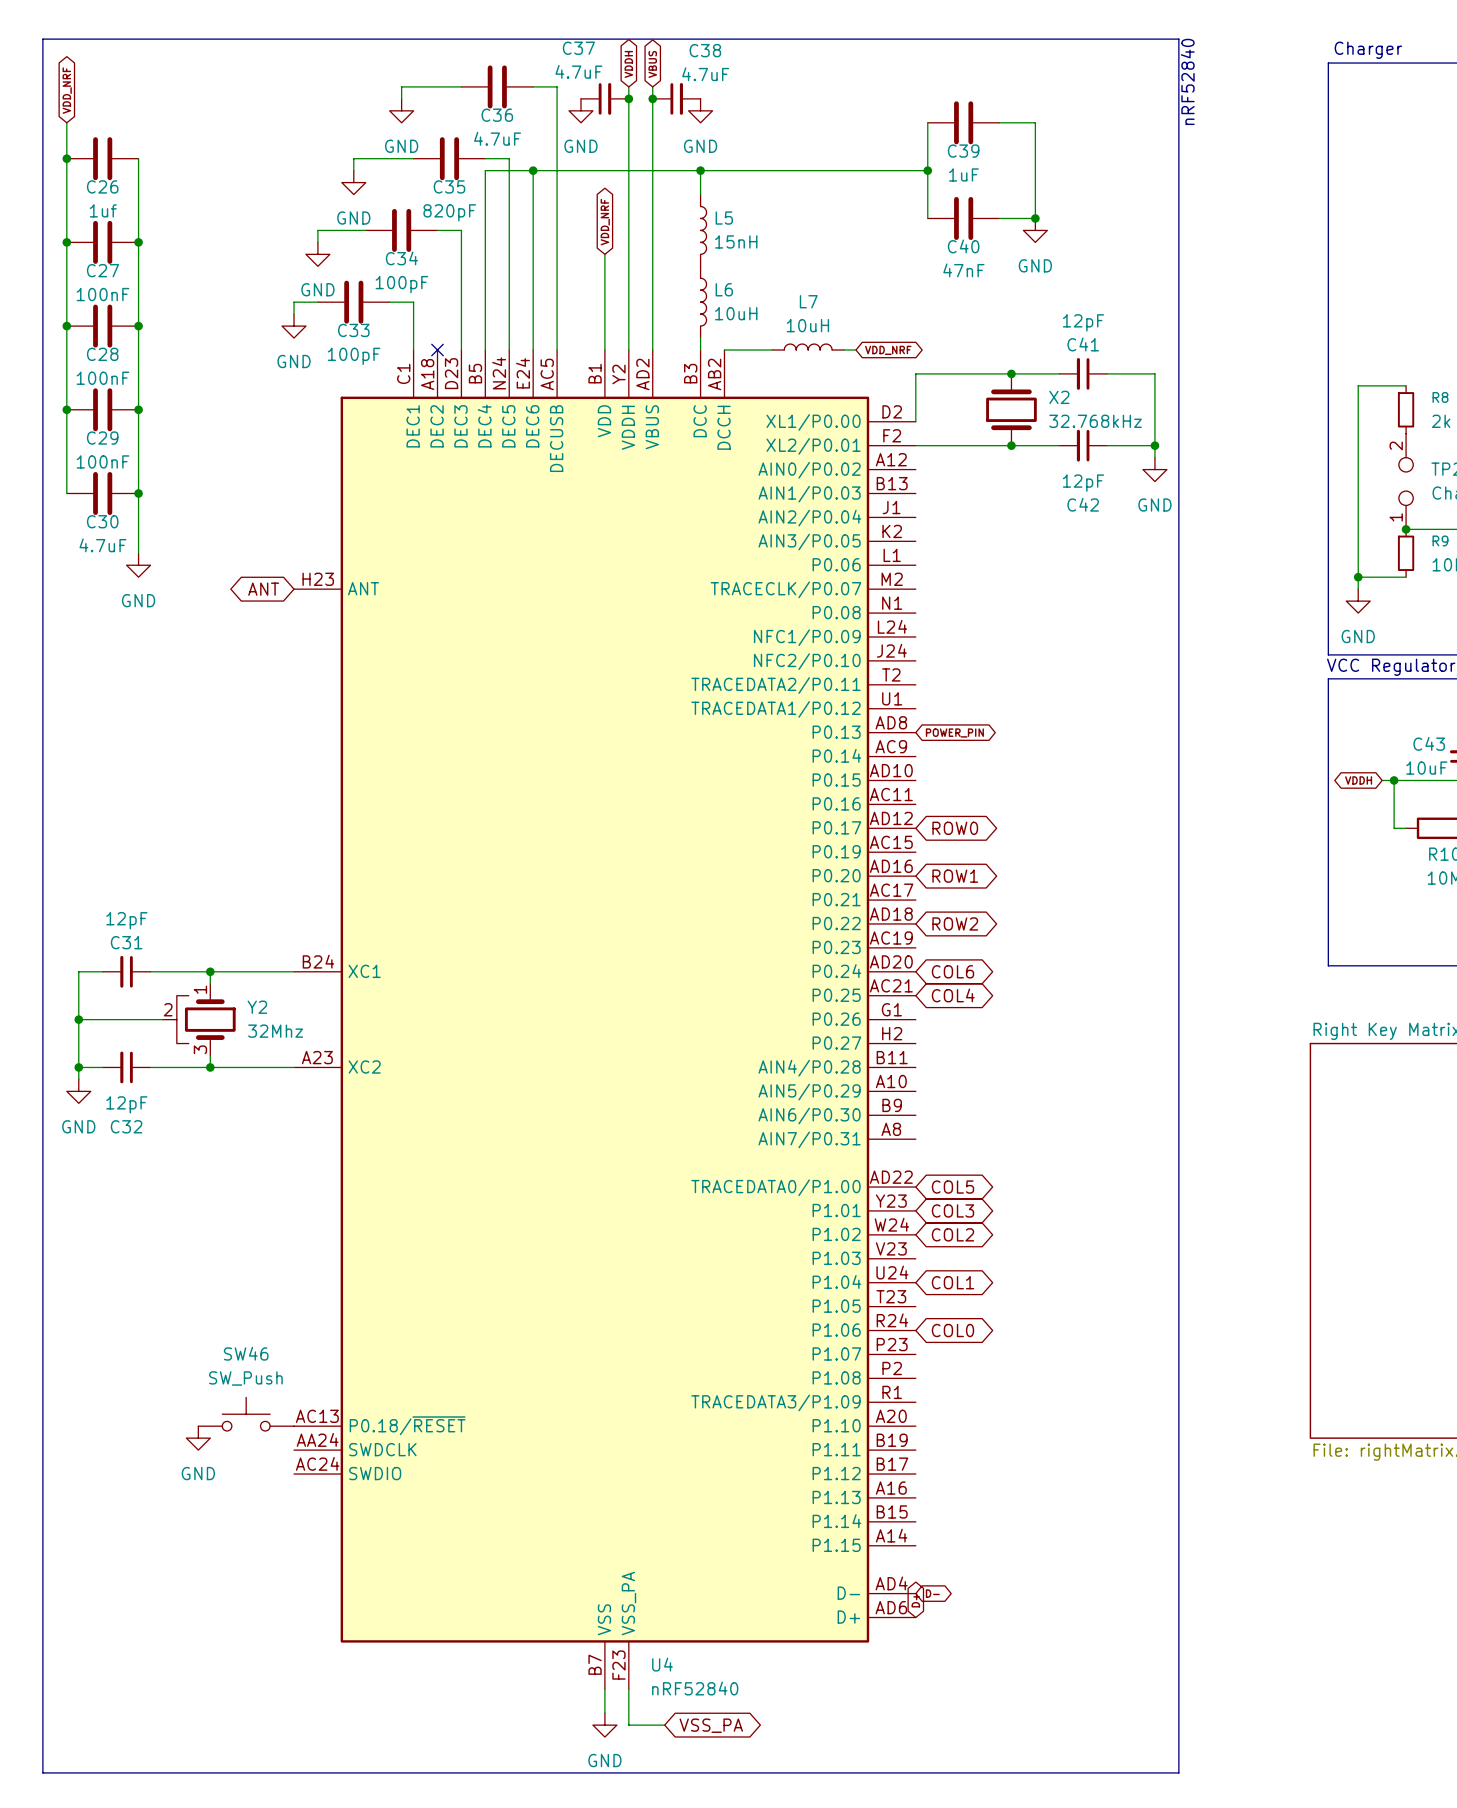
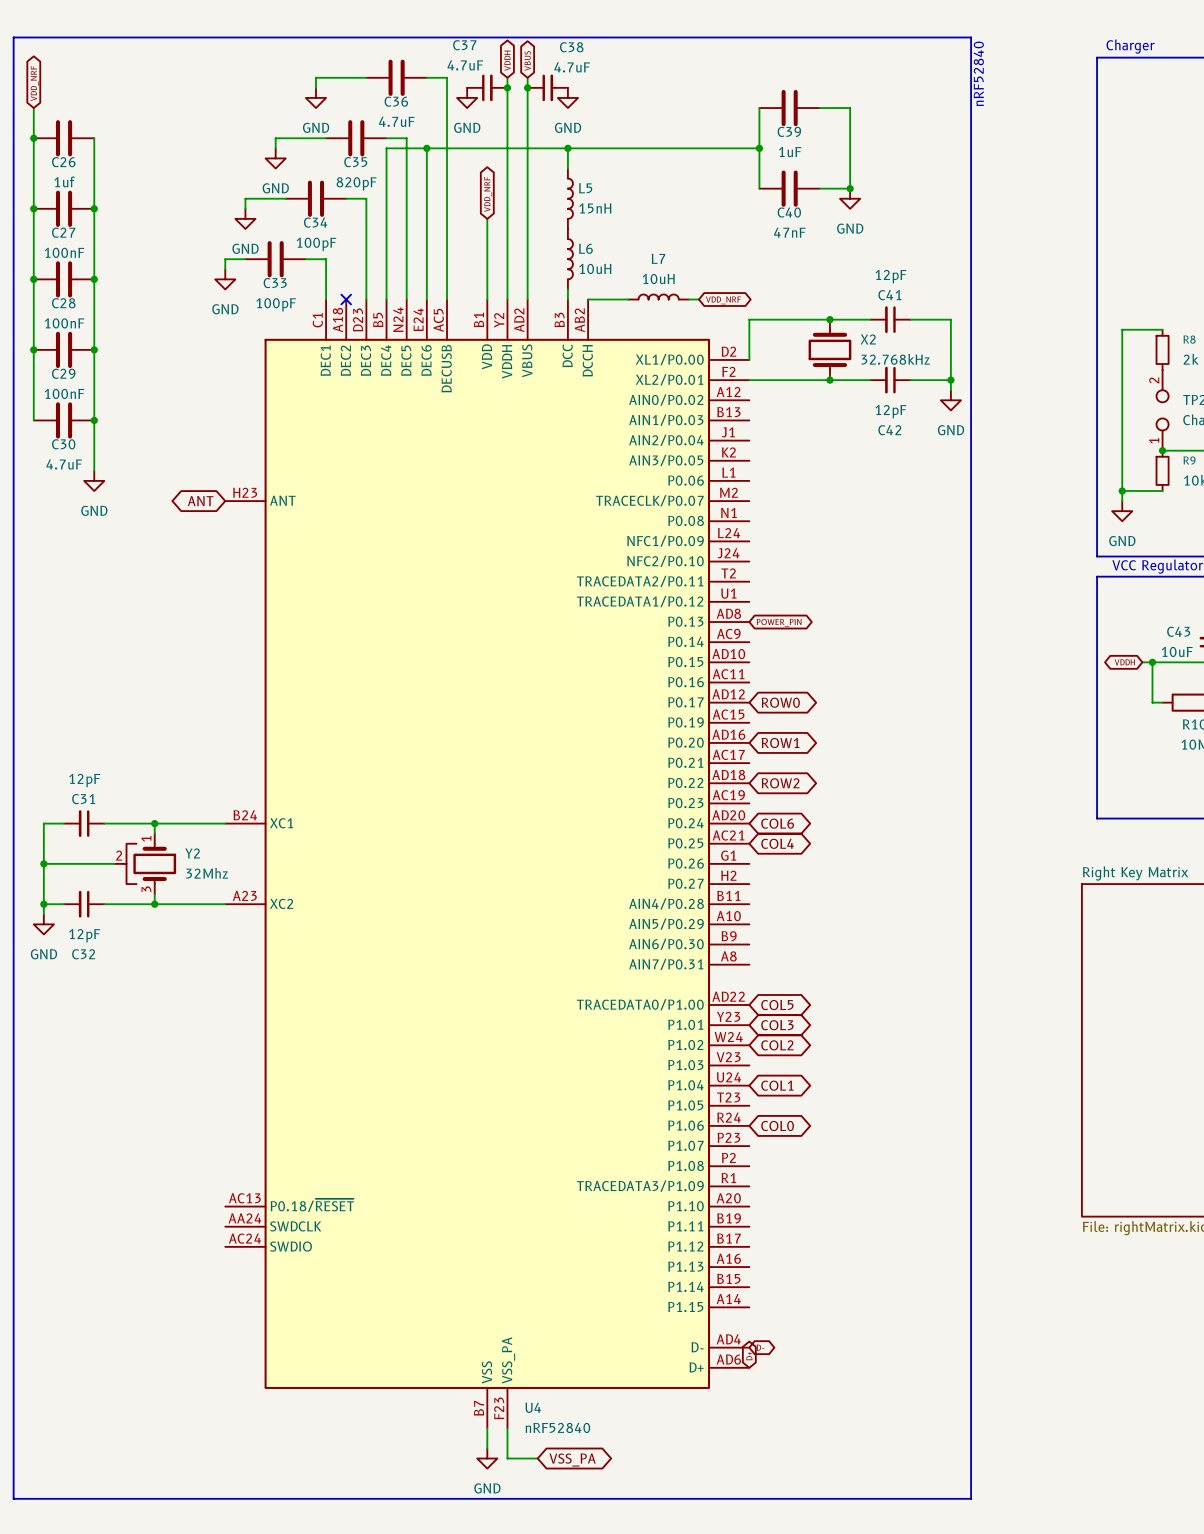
SW46: SW_Push (246, 1414) -> none
power symbol: GND (198, 1438) -> none

